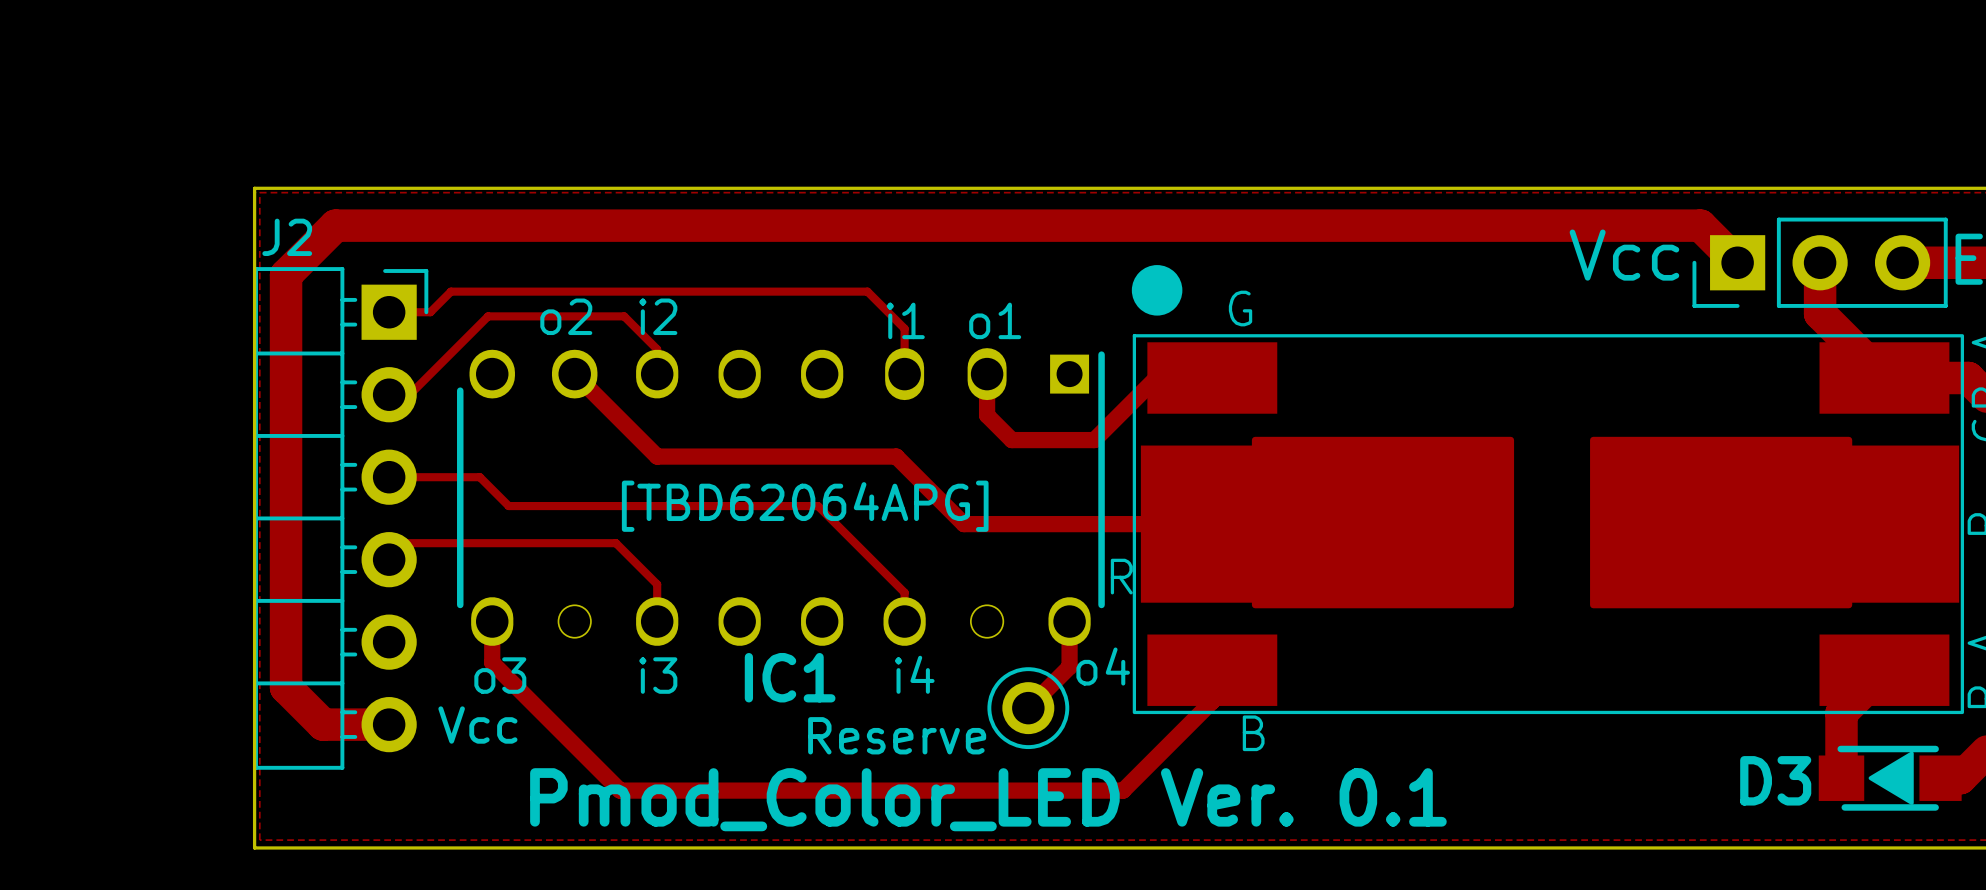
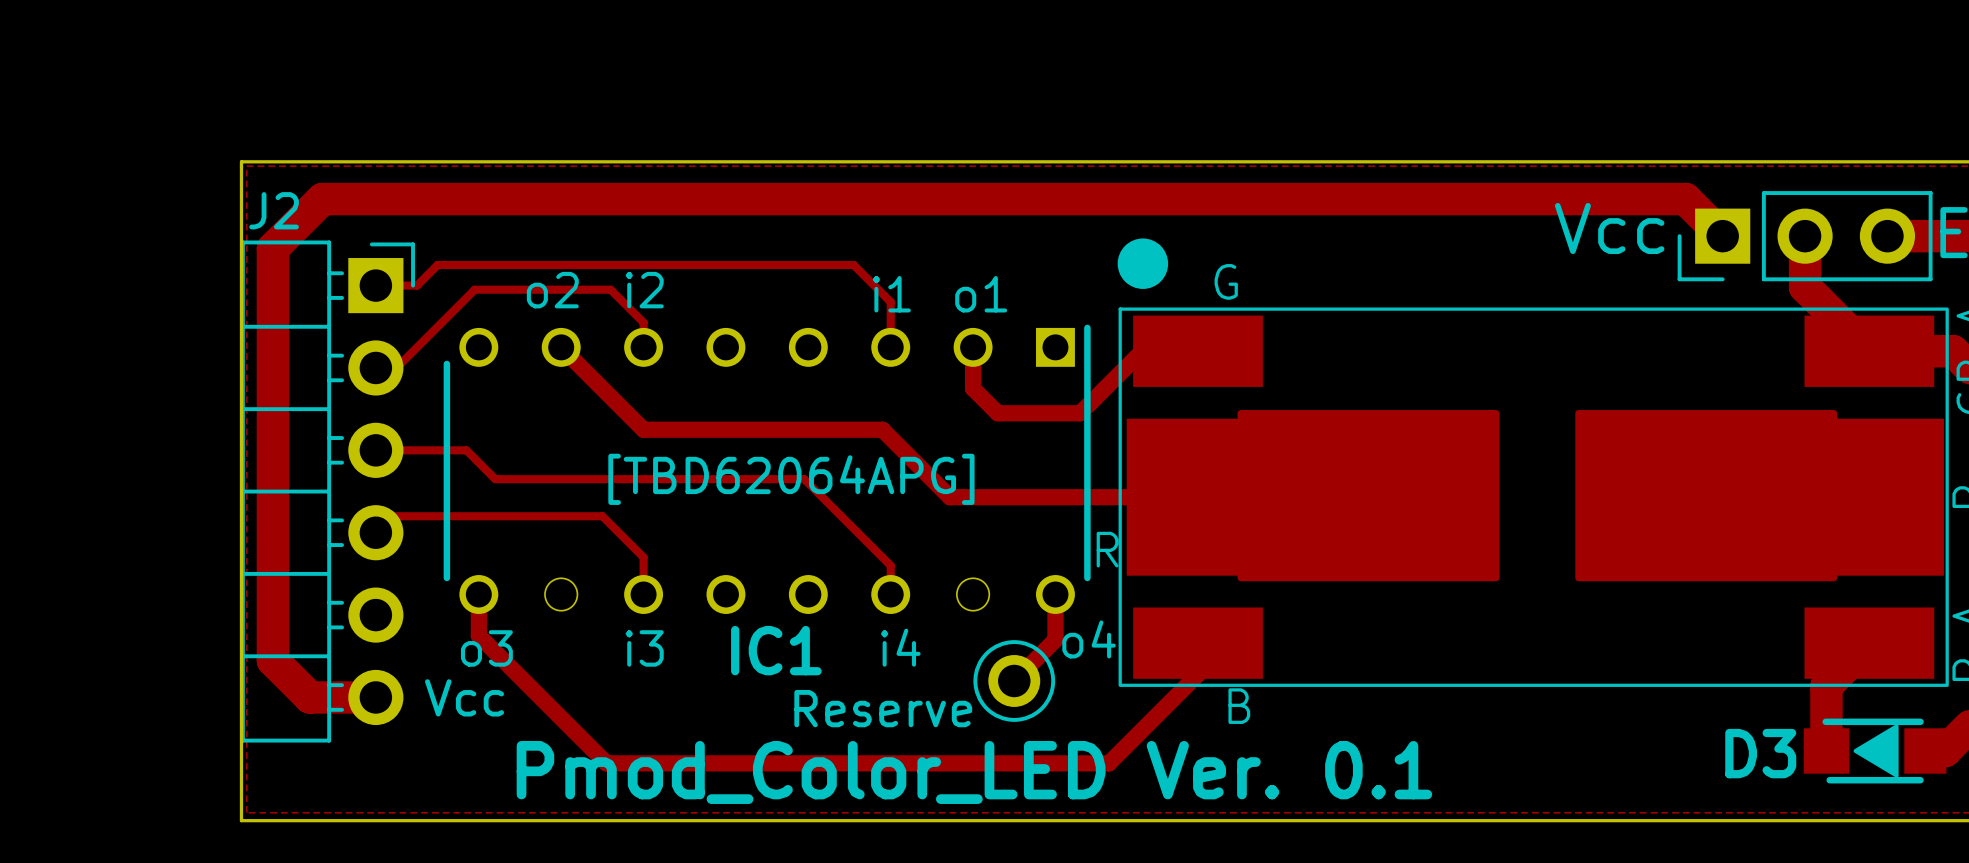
IC1 footprint: [457, 348, 1105, 646] -> [443, 324, 1091, 614]

